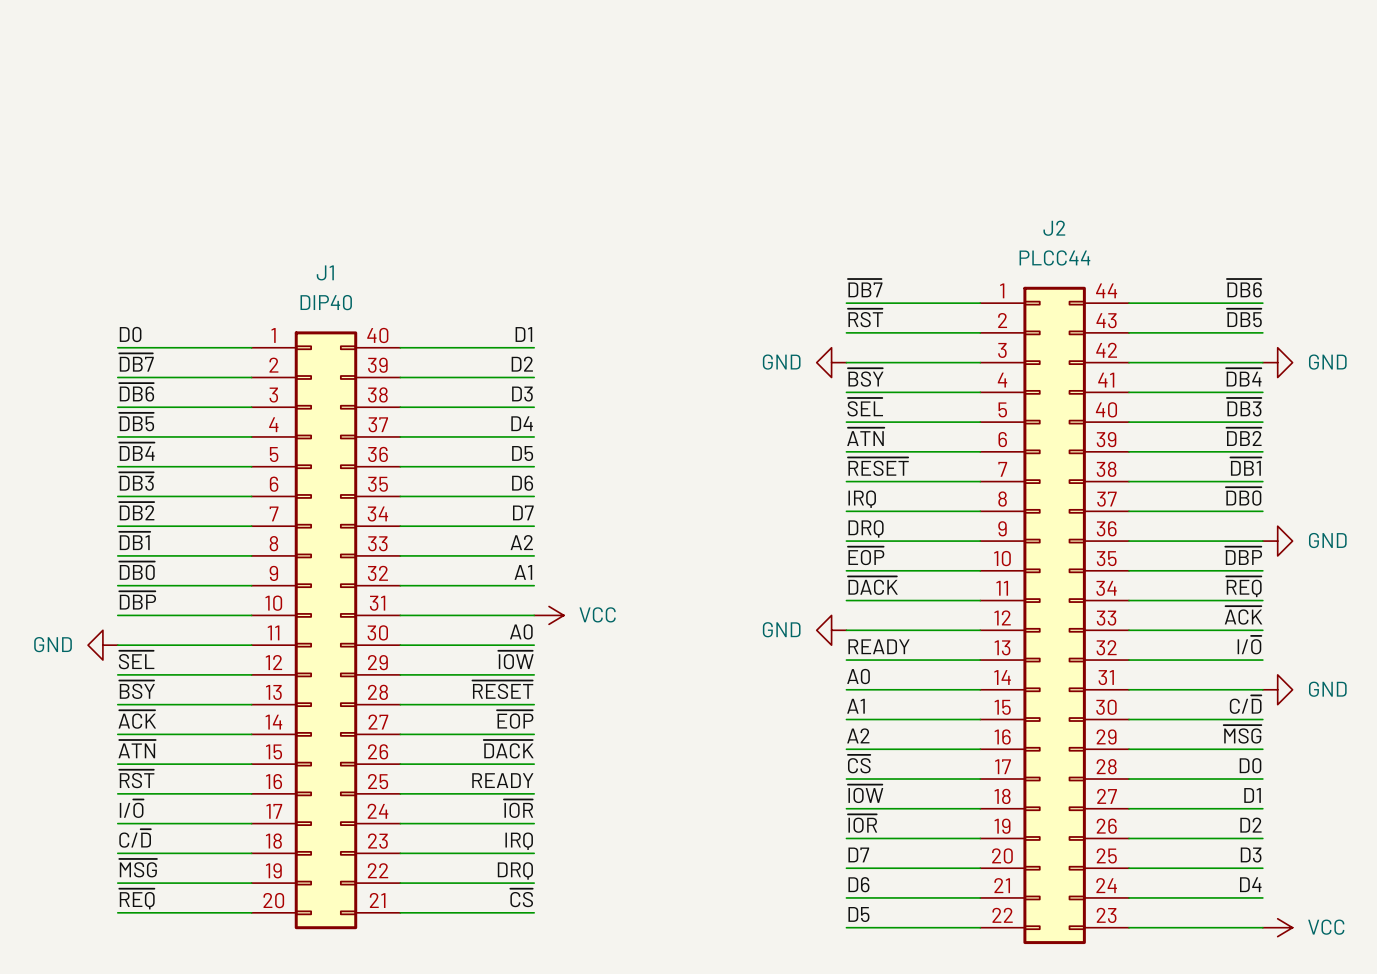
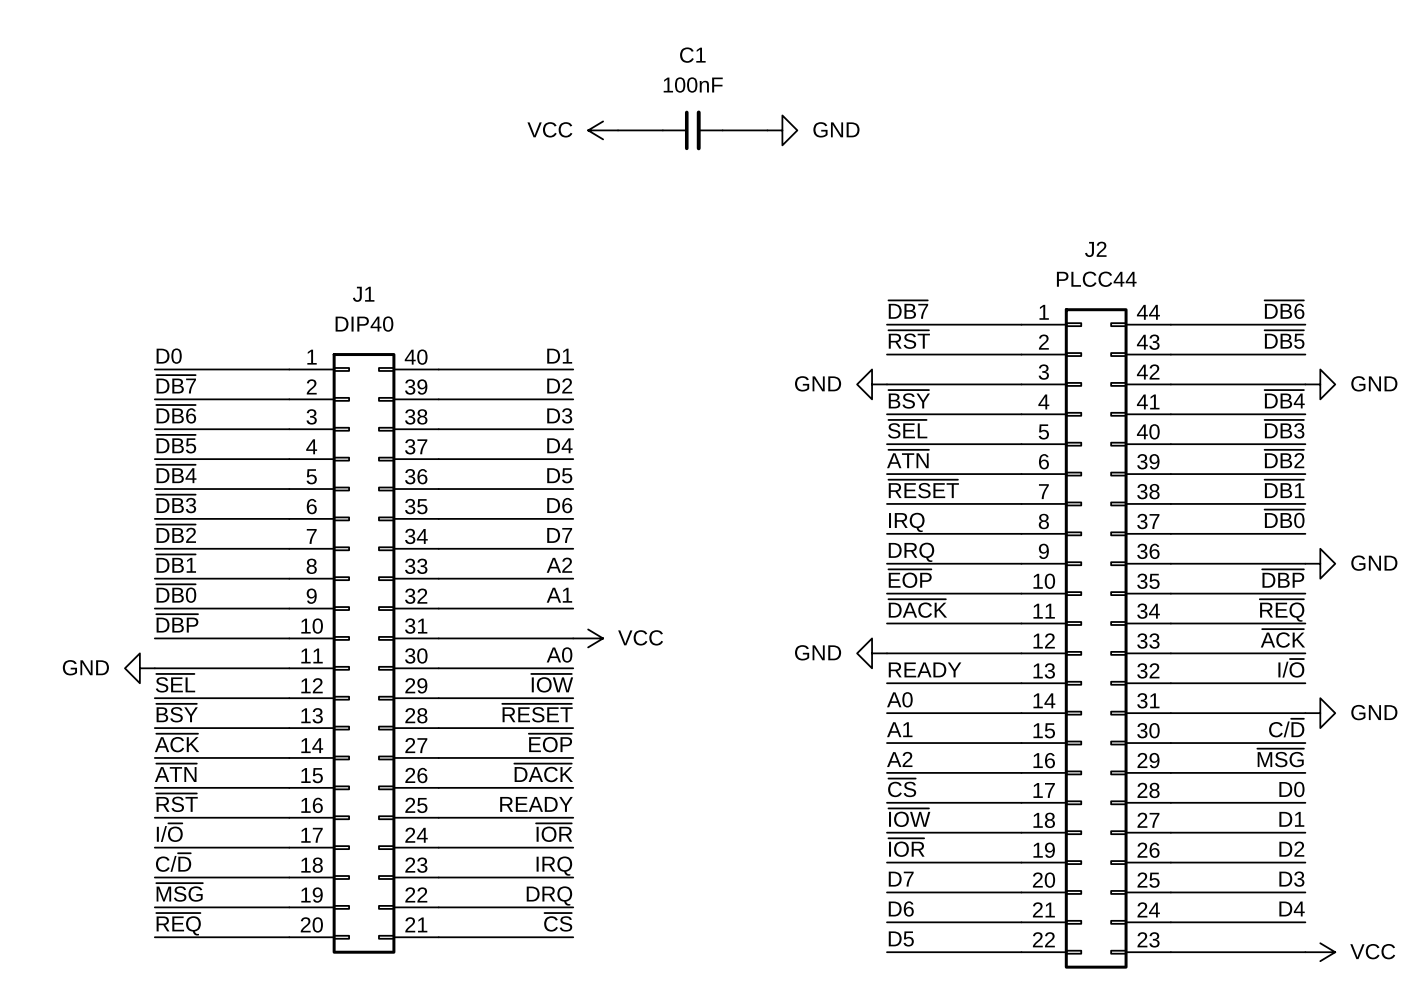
power symbol: none -> VCC (603, 130)
wire: none -> (618, 130) (662, 130)
C1: none -> 100nF (692, 130)
wire: none -> (722, 130) (767, 130)
power symbol: none -> GND (782, 130)

